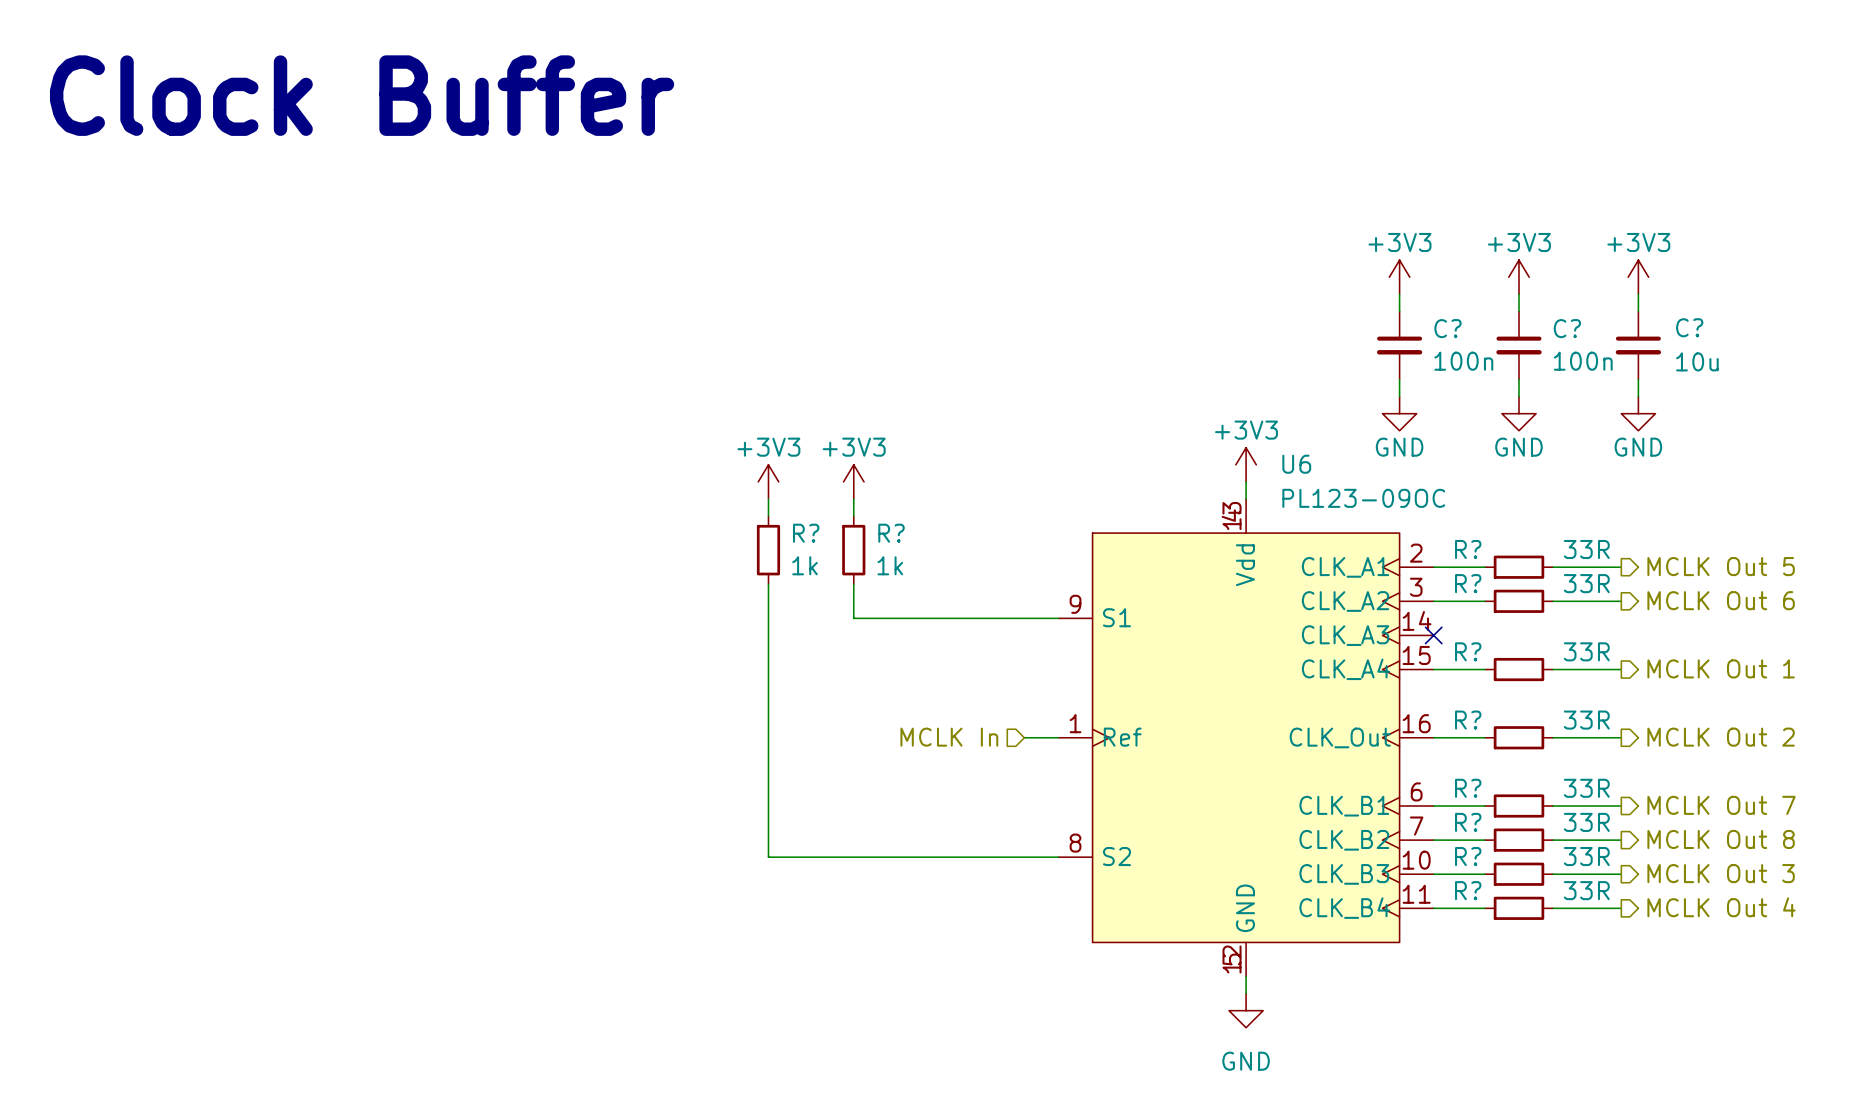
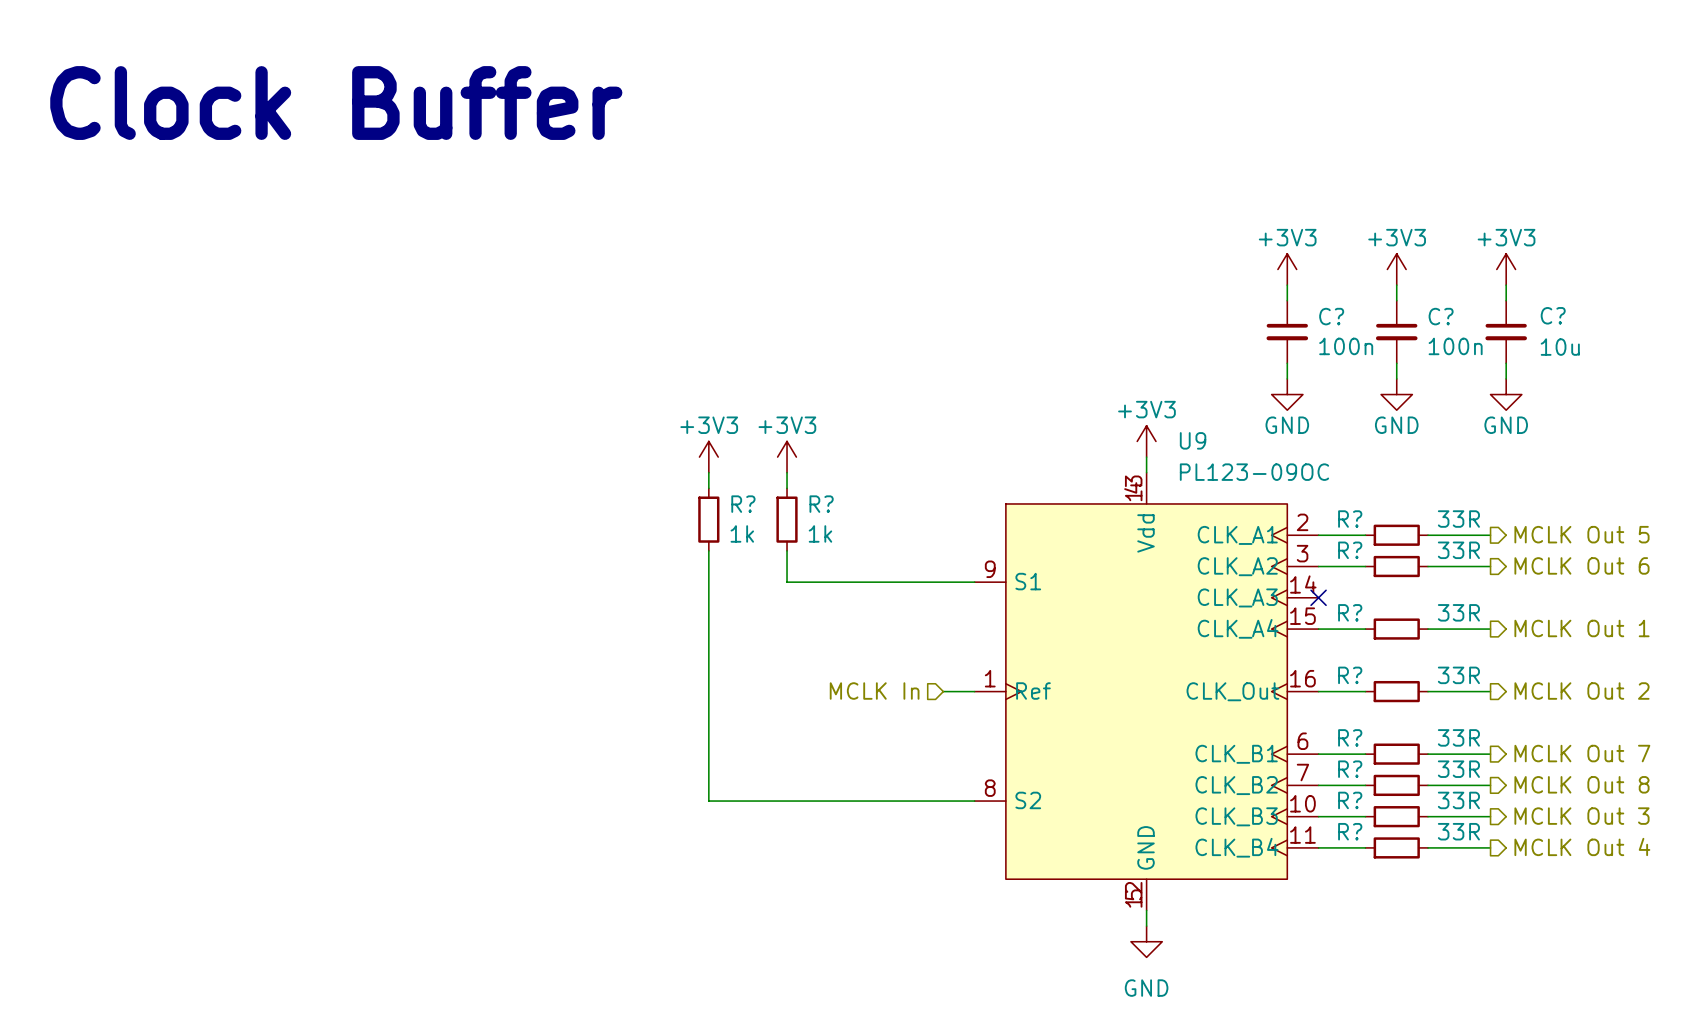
U6 name: U6 (1296, 464) -> U9 (1193, 440)

